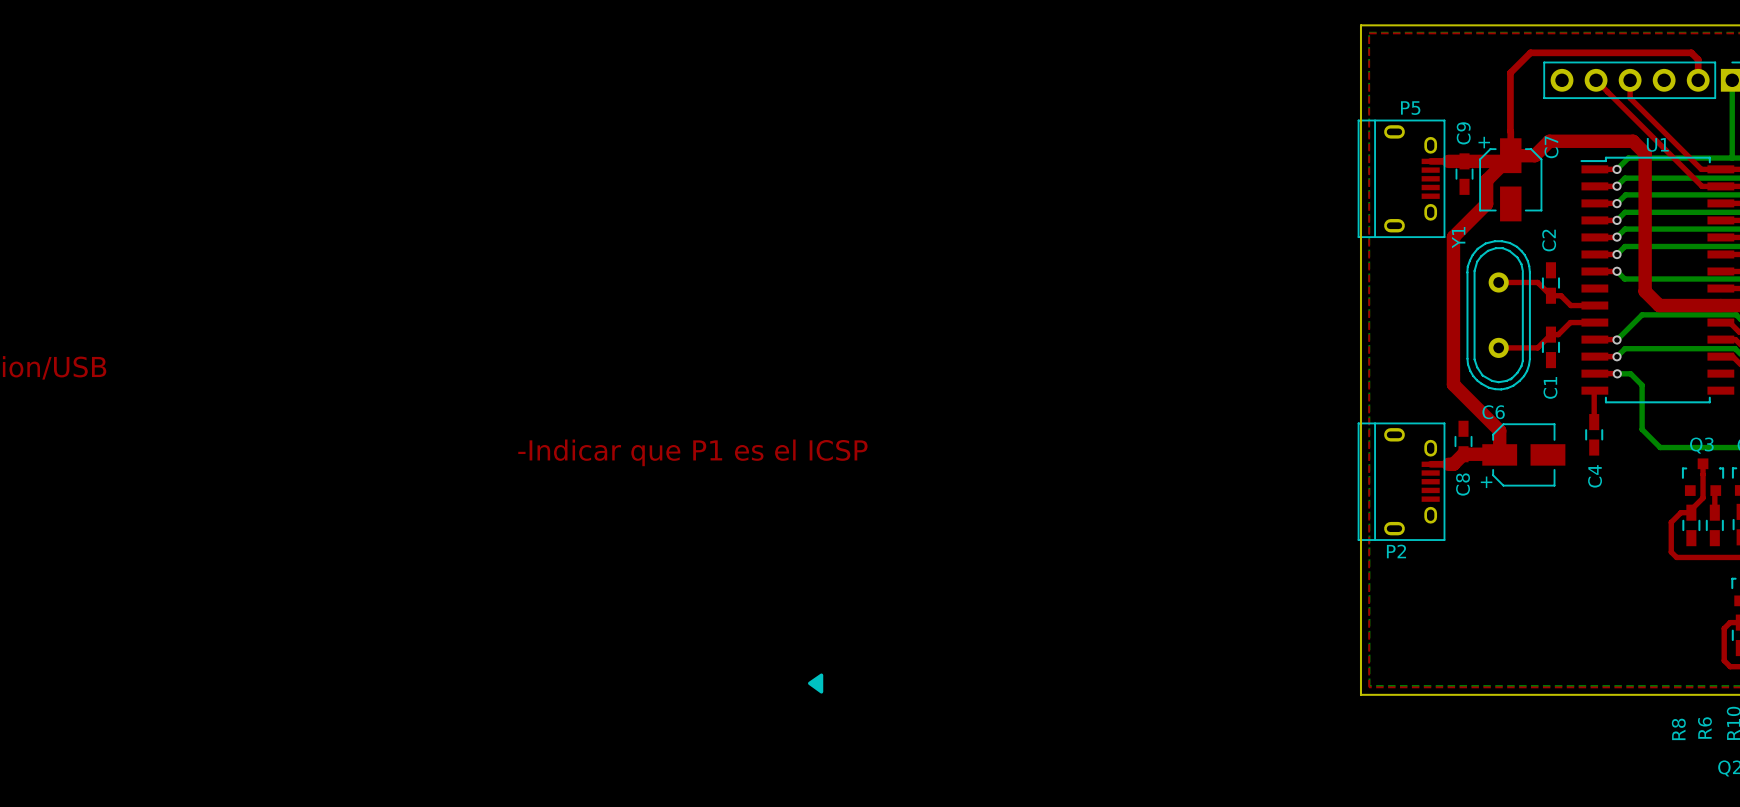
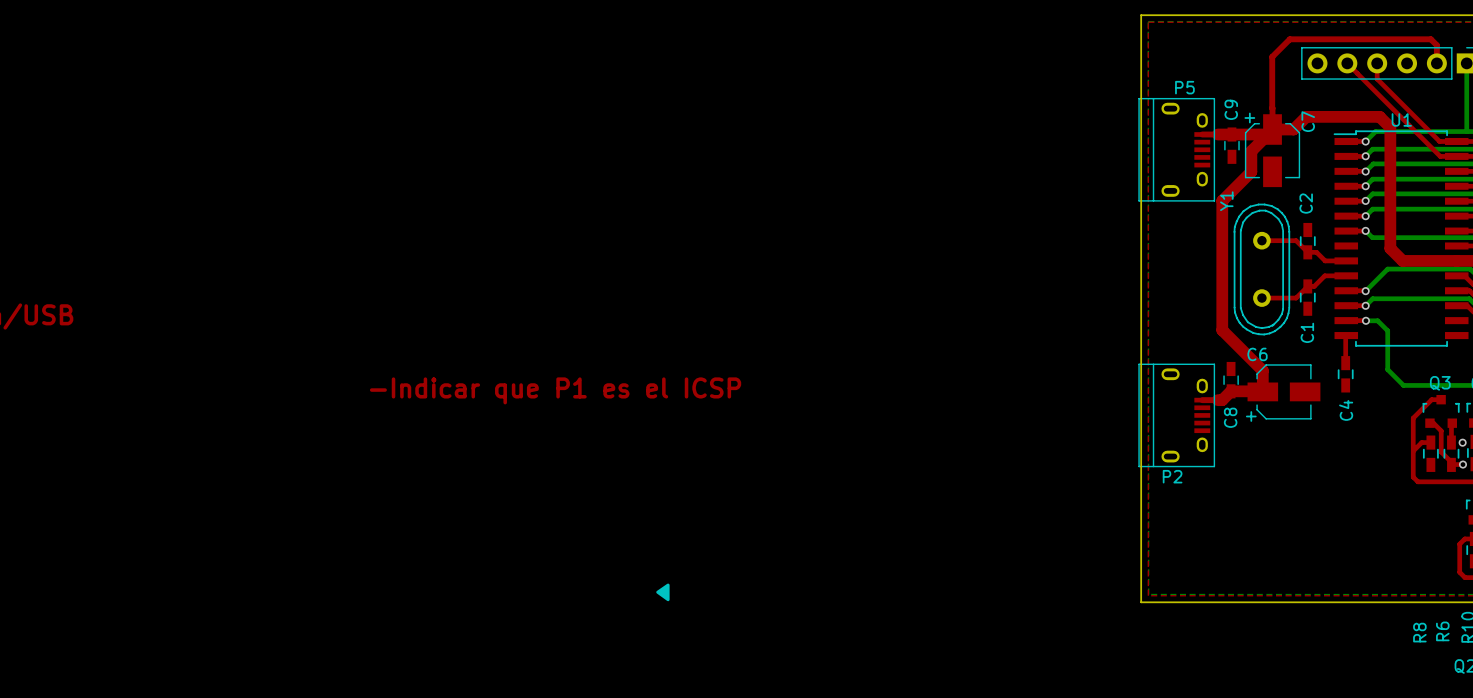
top track: (1703, 463) (1703, 498) (1691, 509) -> (1441, 399) (1431, 399) (1413, 418) (1413, 451)
top track: none -> (1429, 423) (1433, 423) (1441, 430) (1441, 452) (1451, 462) (1451, 464) (1462, 464)
via: none -> (1462, 442)
via: none -> (1462, 464)

